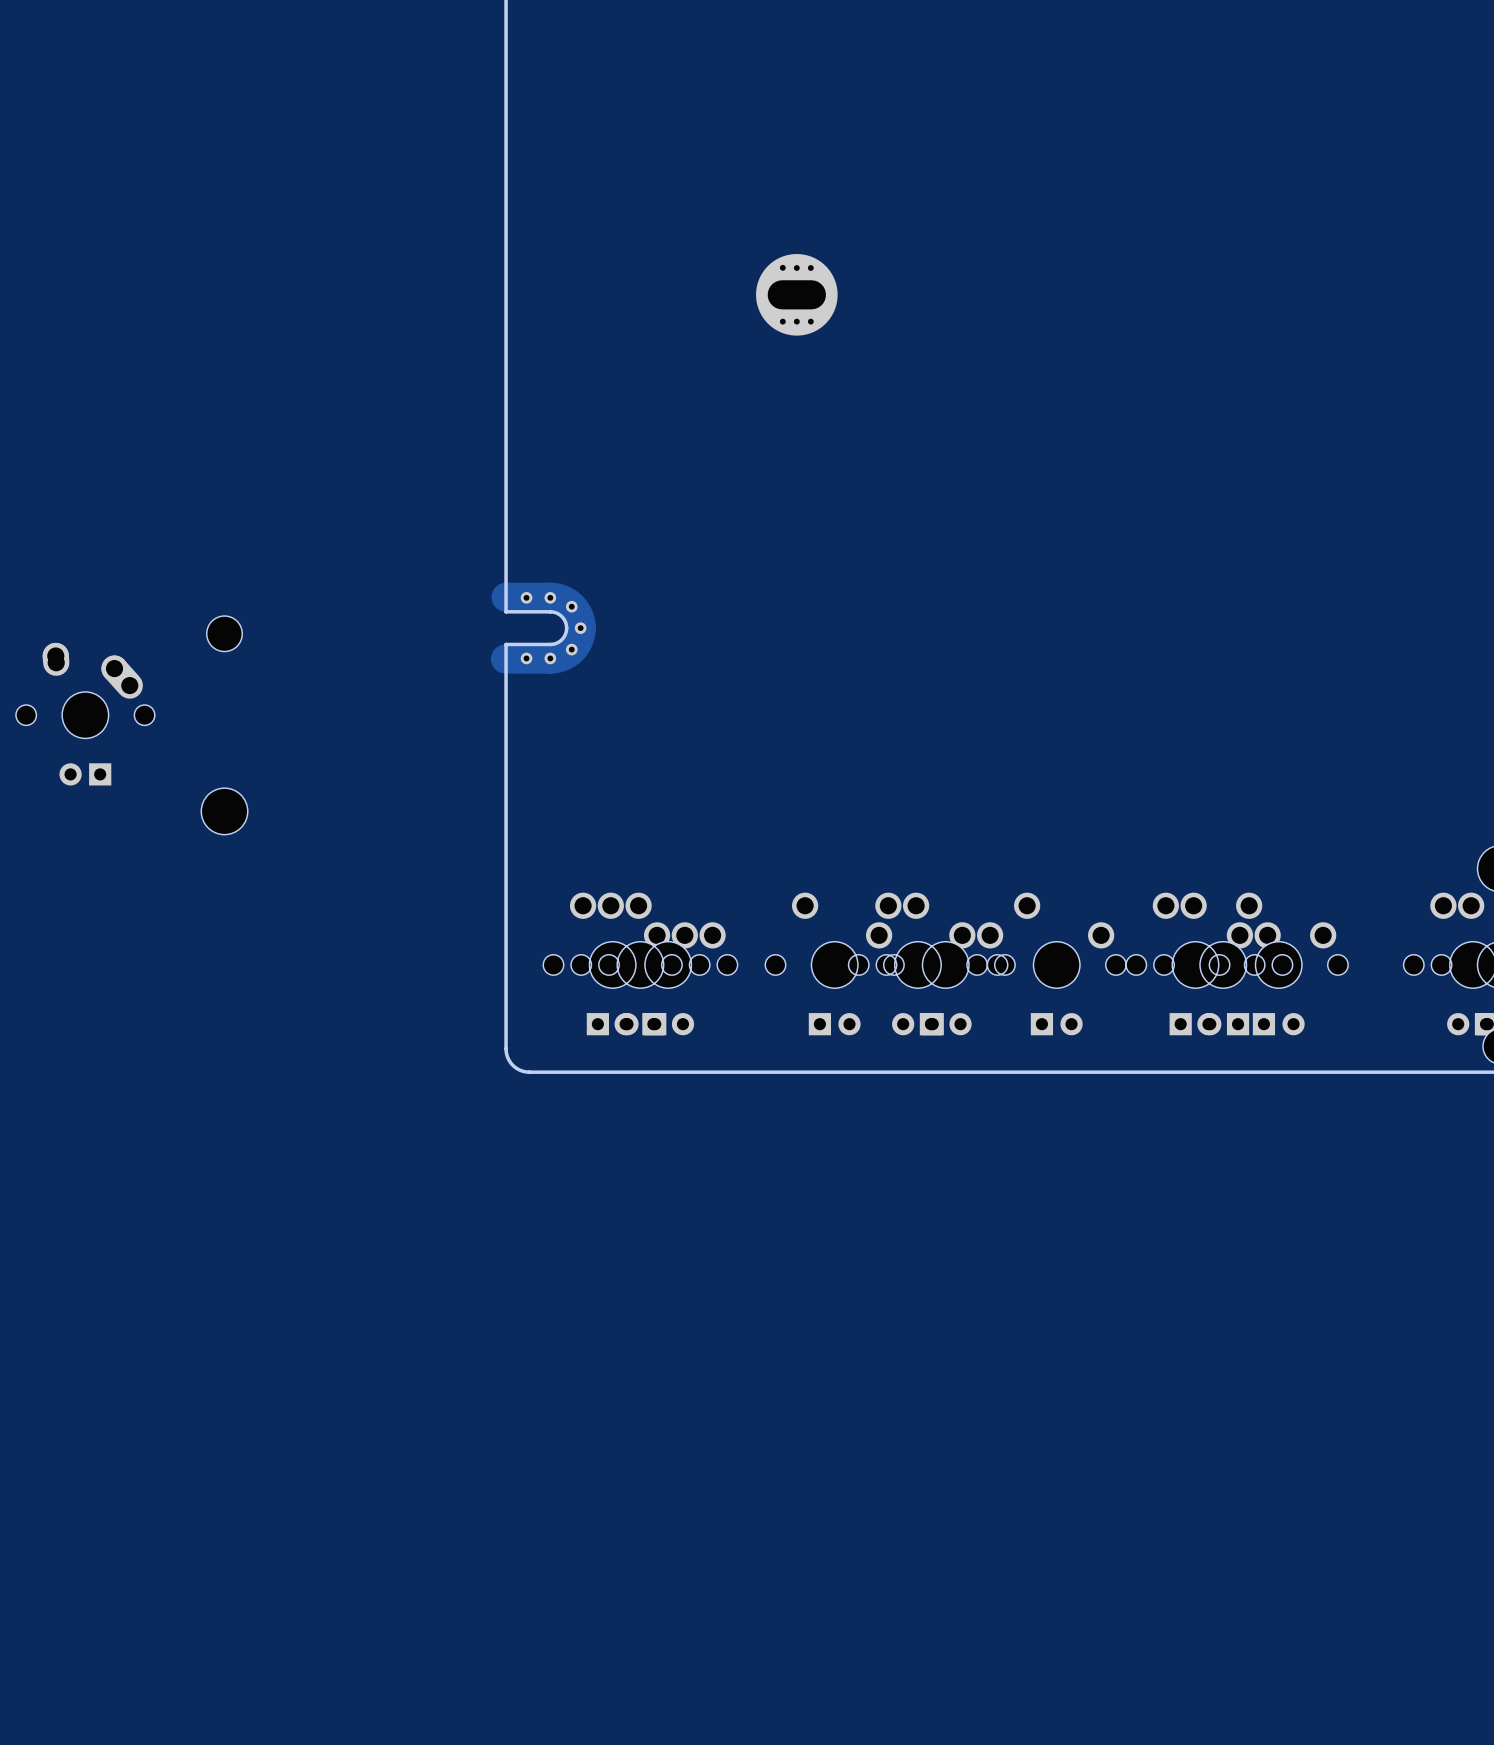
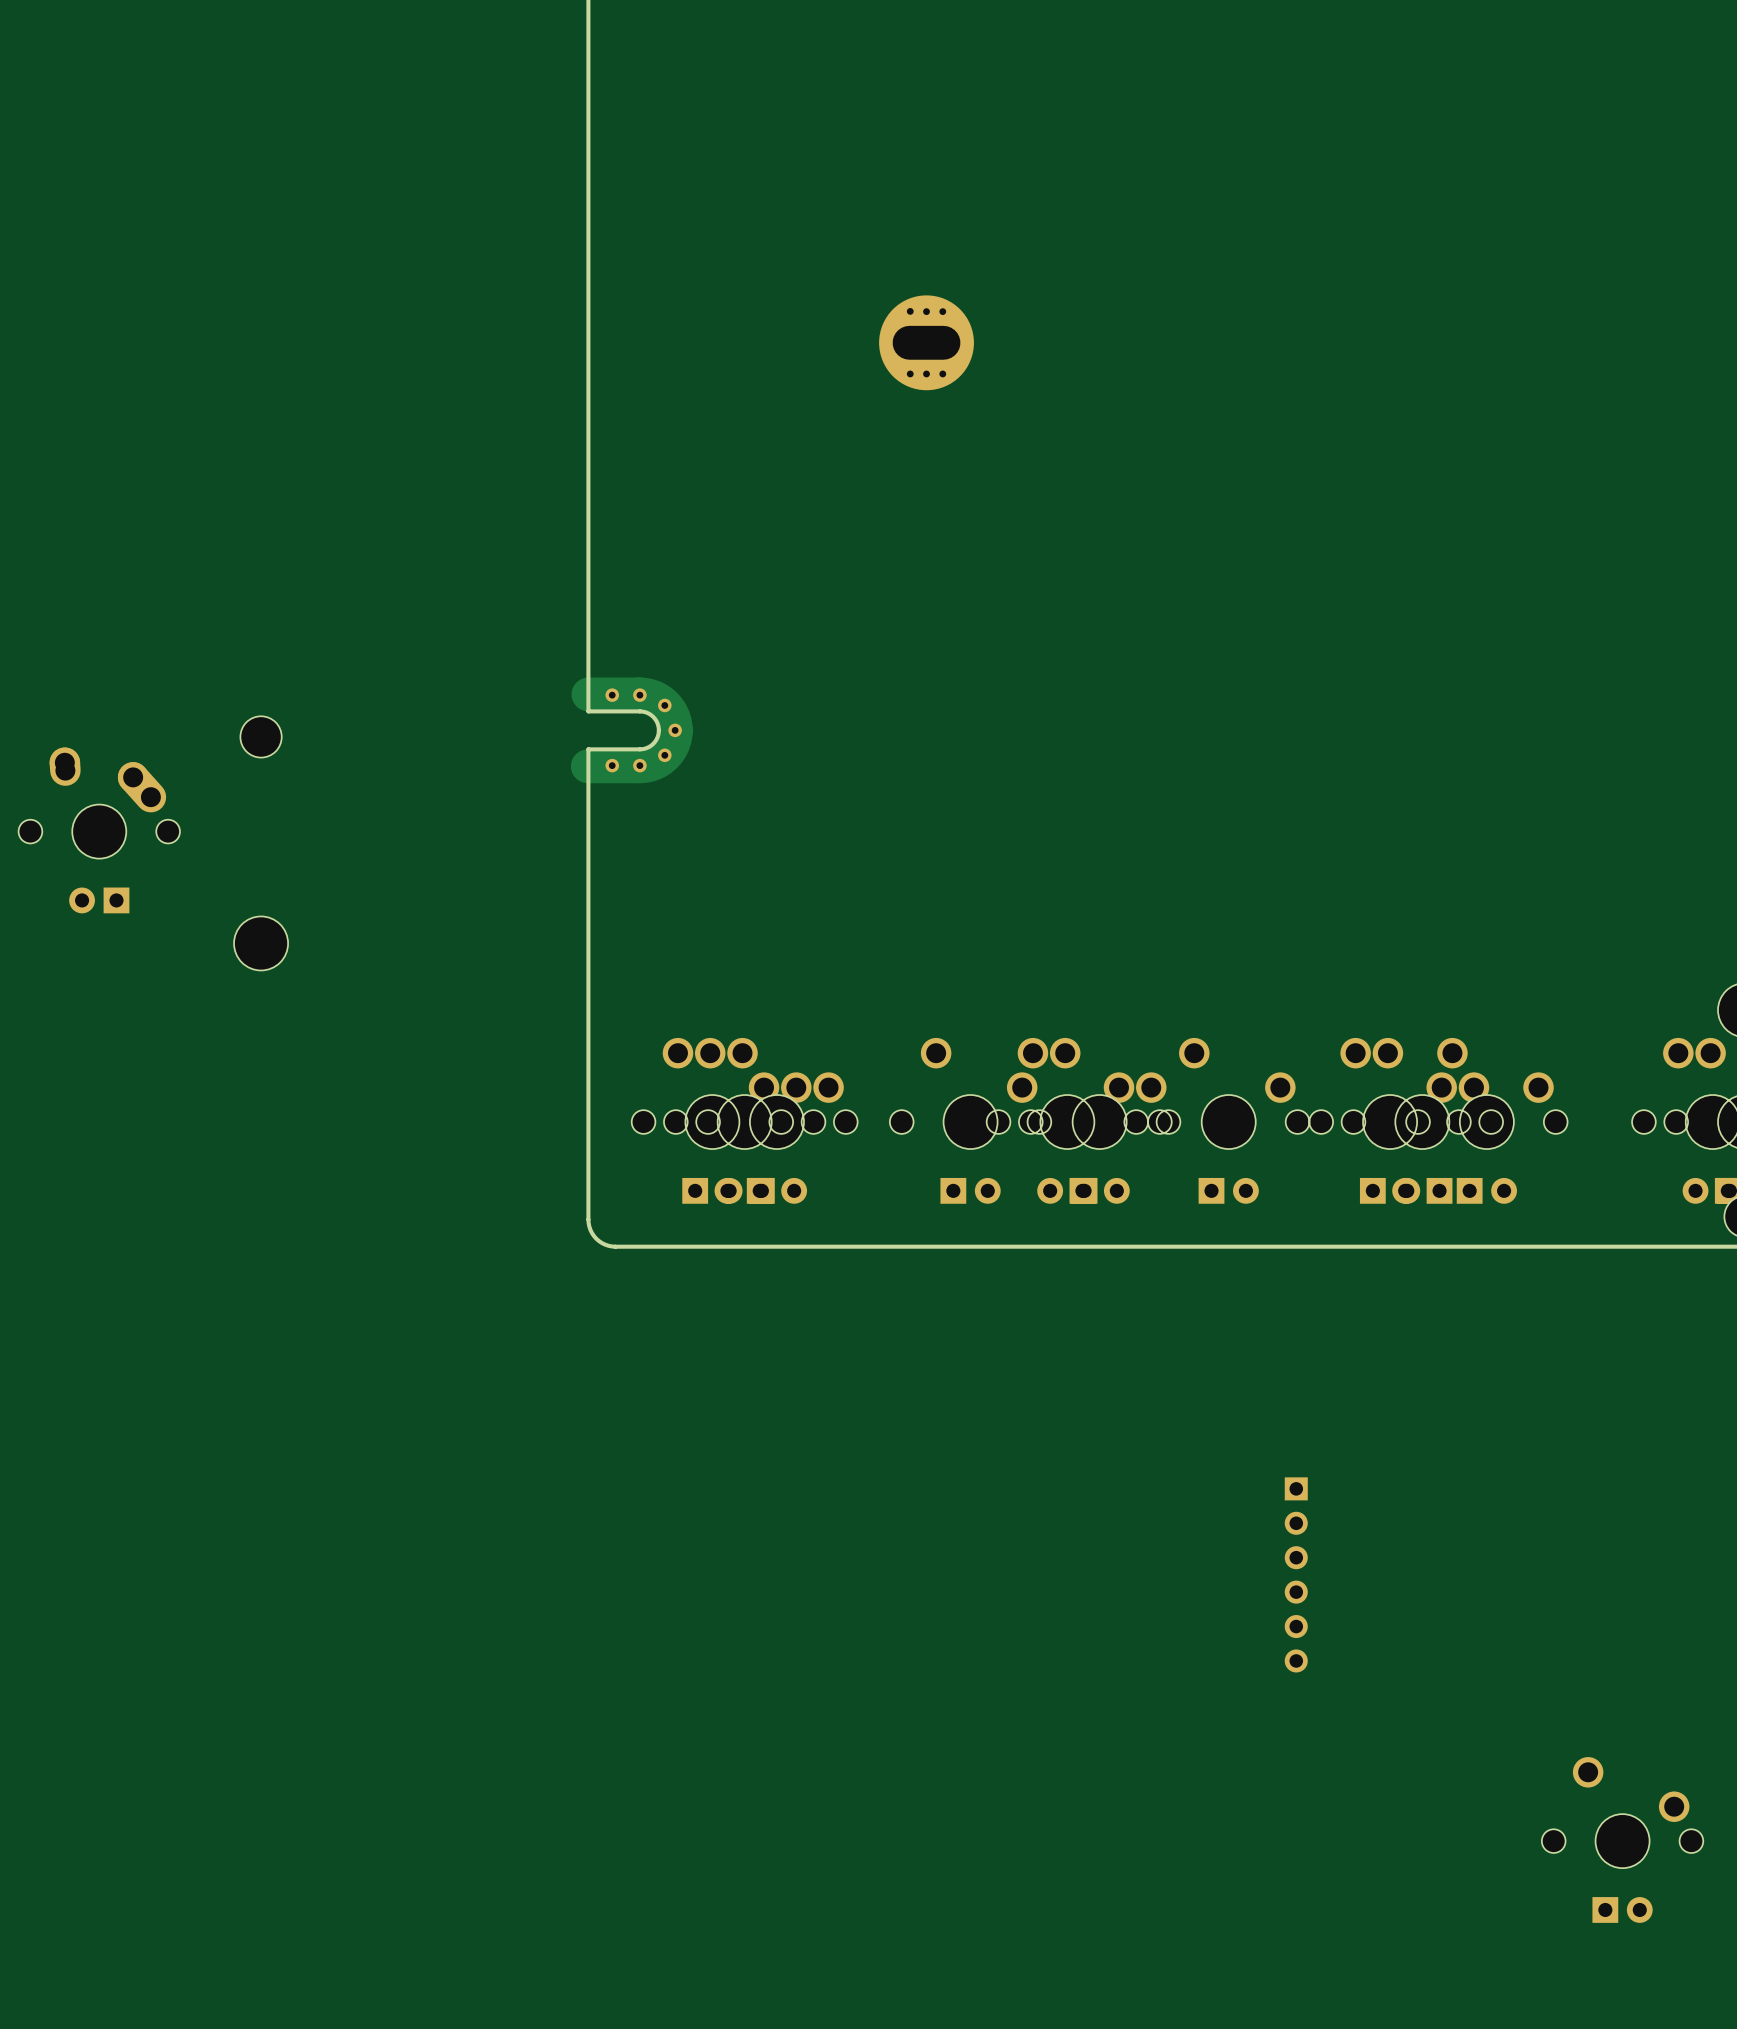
part: none -> (1296, 1574)
part: none -> (1622, 1839)

